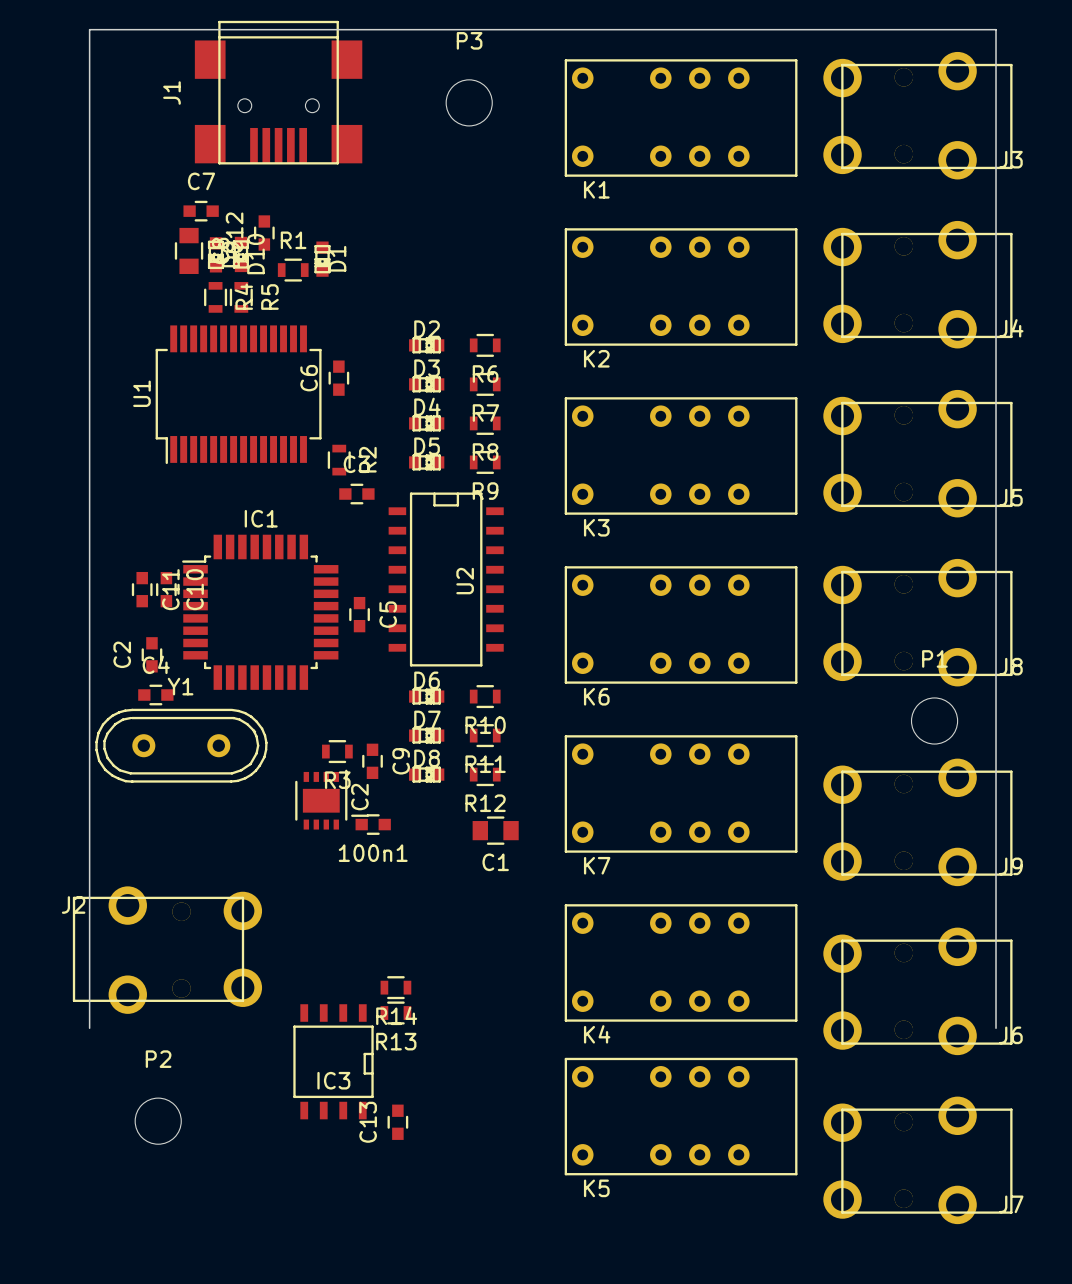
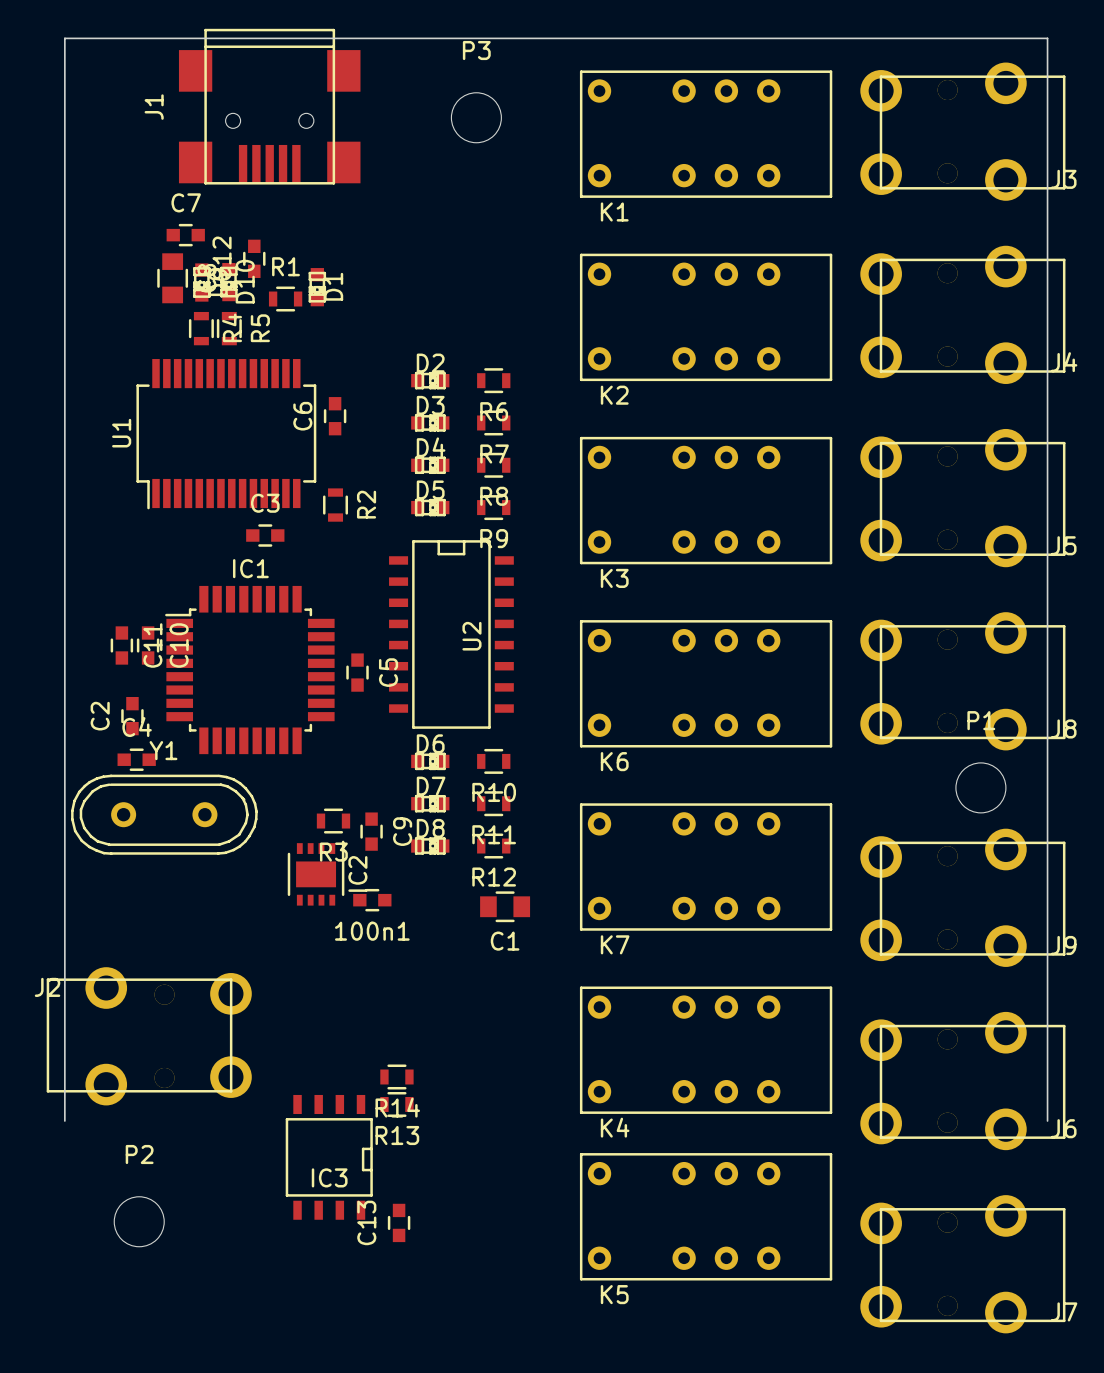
C3 position: (356, 494) -> (265, 535)

